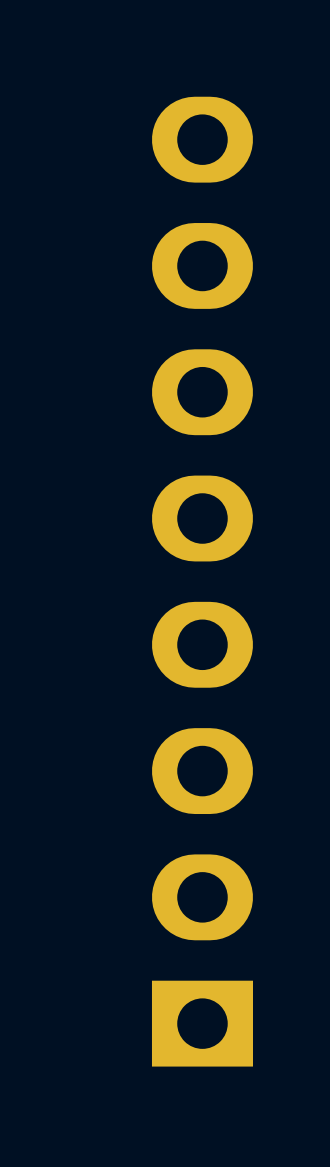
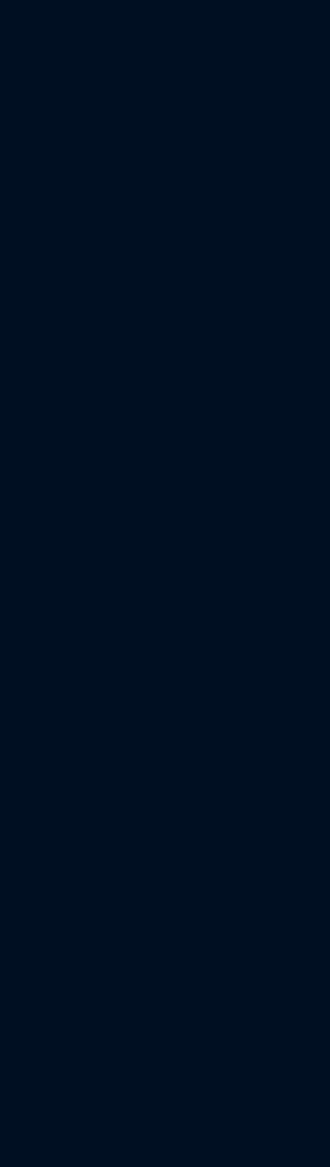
part: (202, 581) -> none

